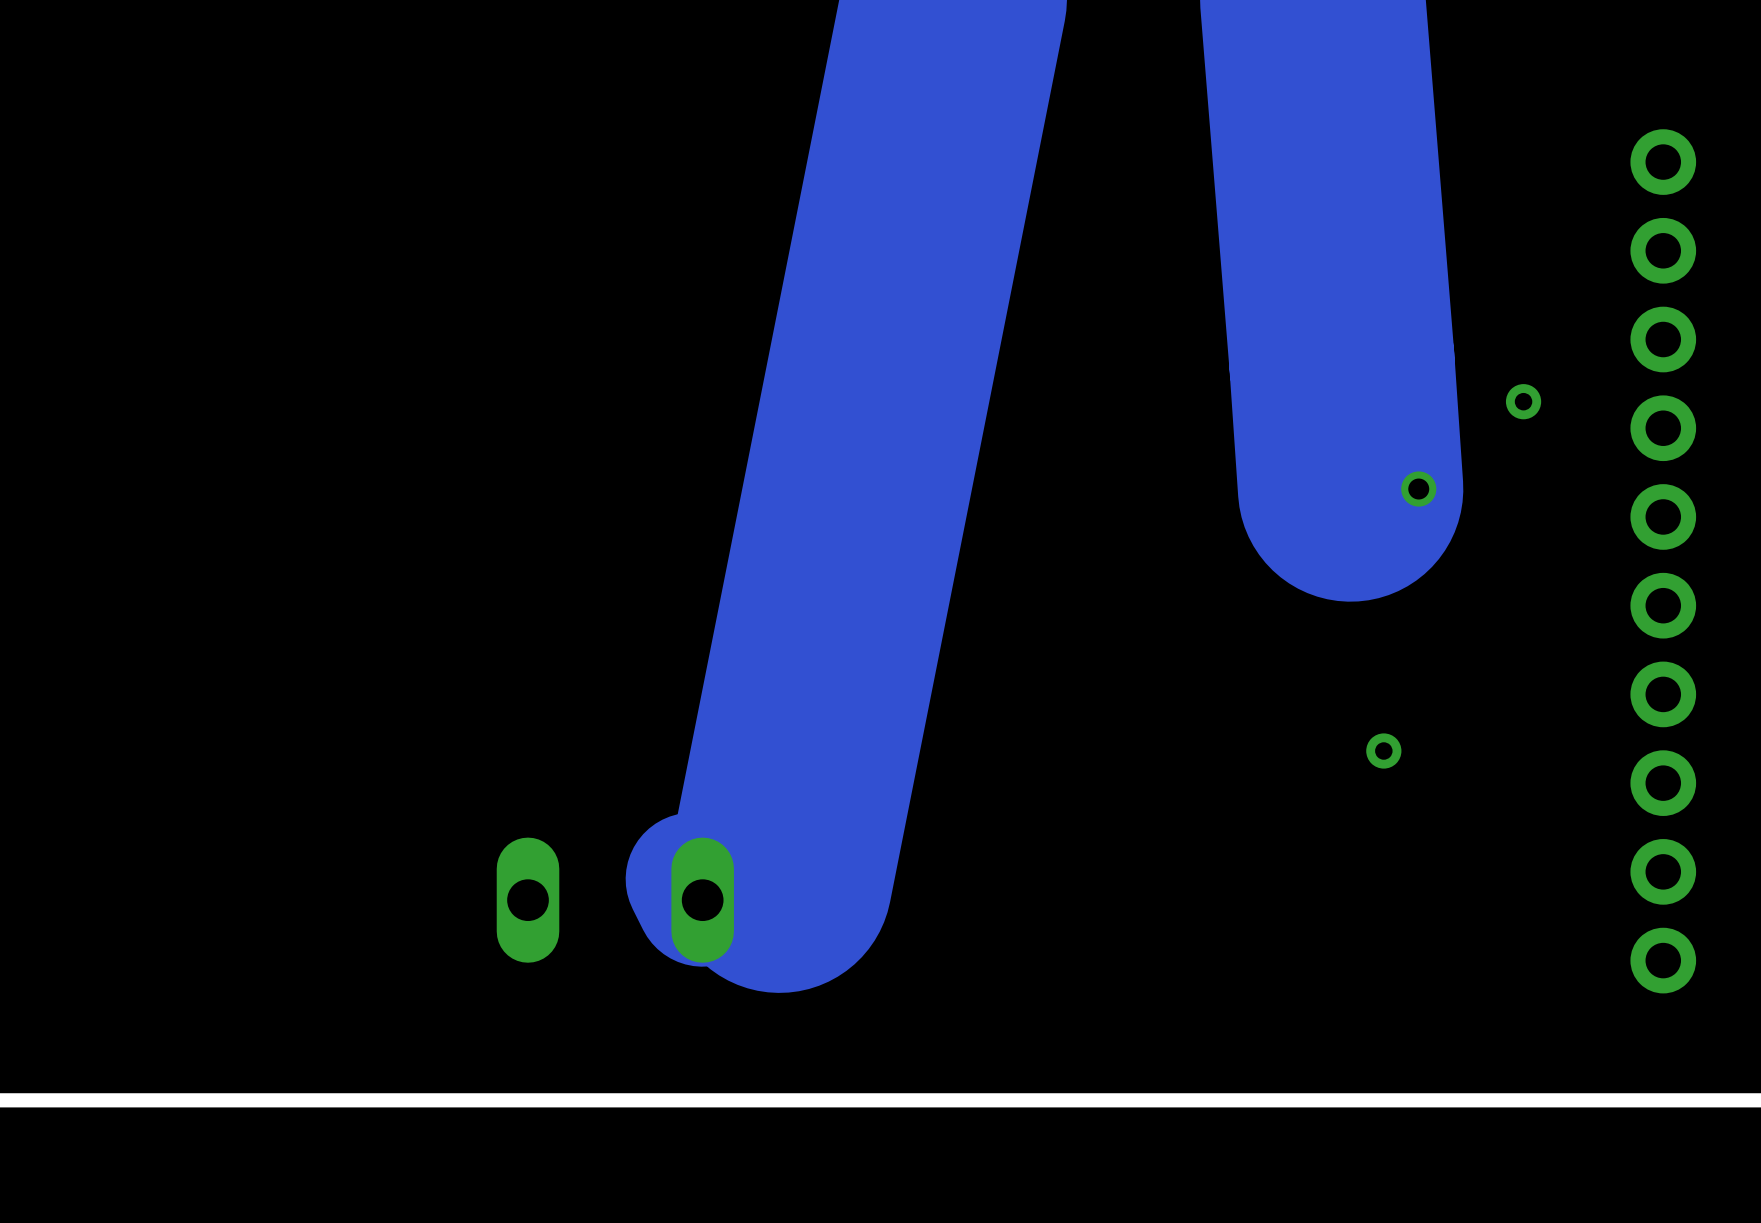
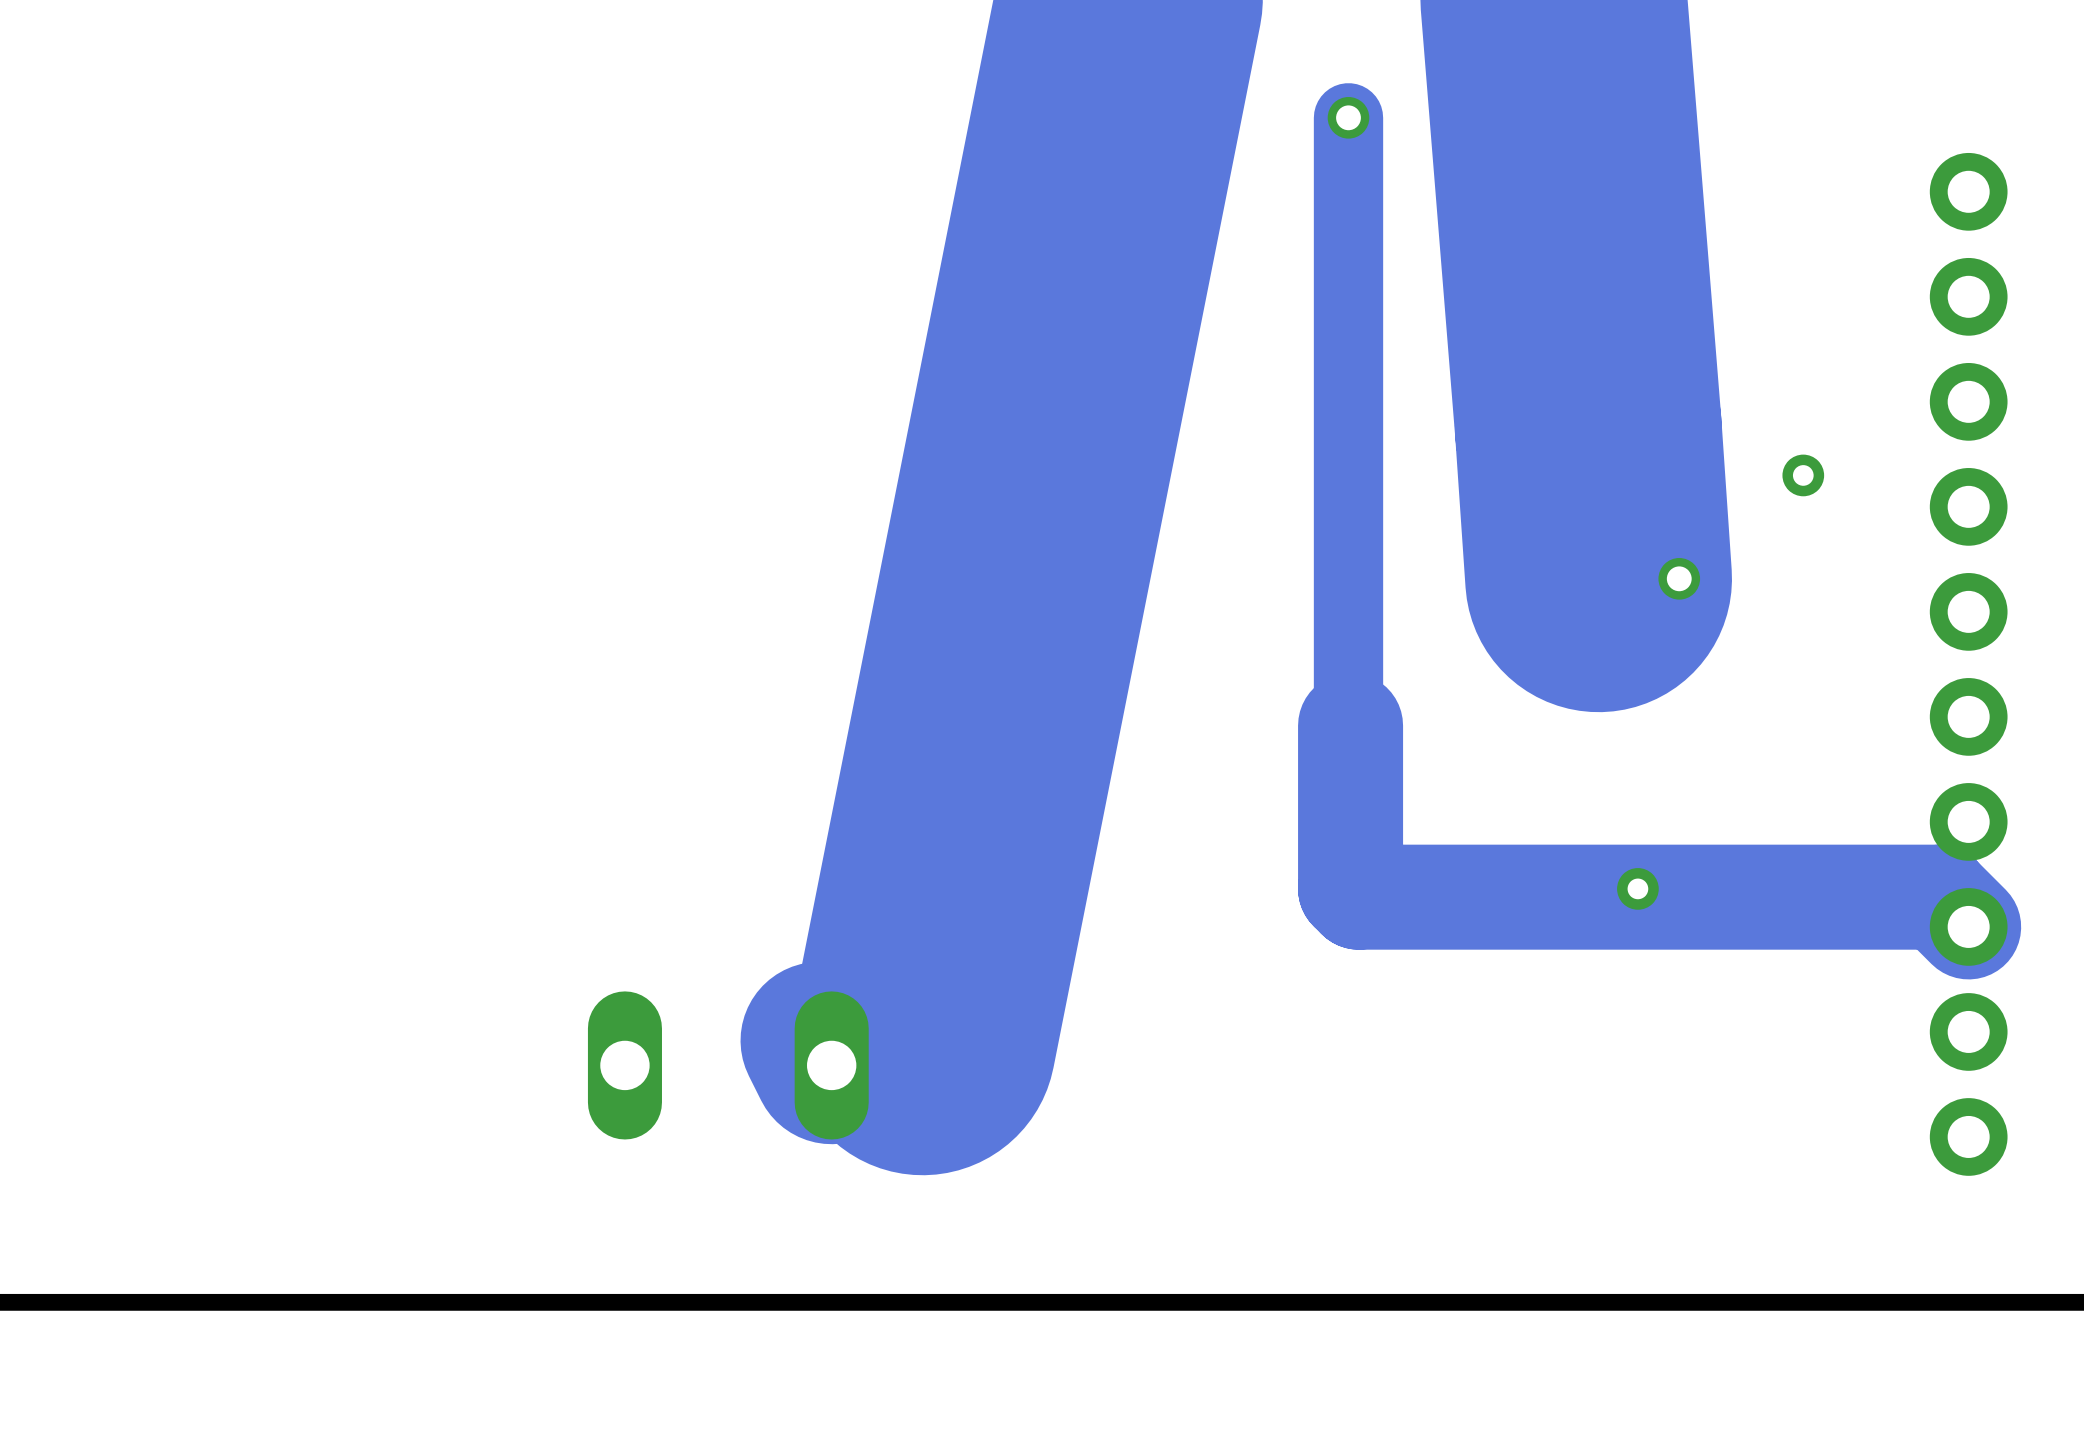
track: none -> (1348, 117) (1348, 723) (1350, 725) (1350, 888) (1358, 897) (1938, 897) (1968, 926)
via: none -> (1348, 117)

